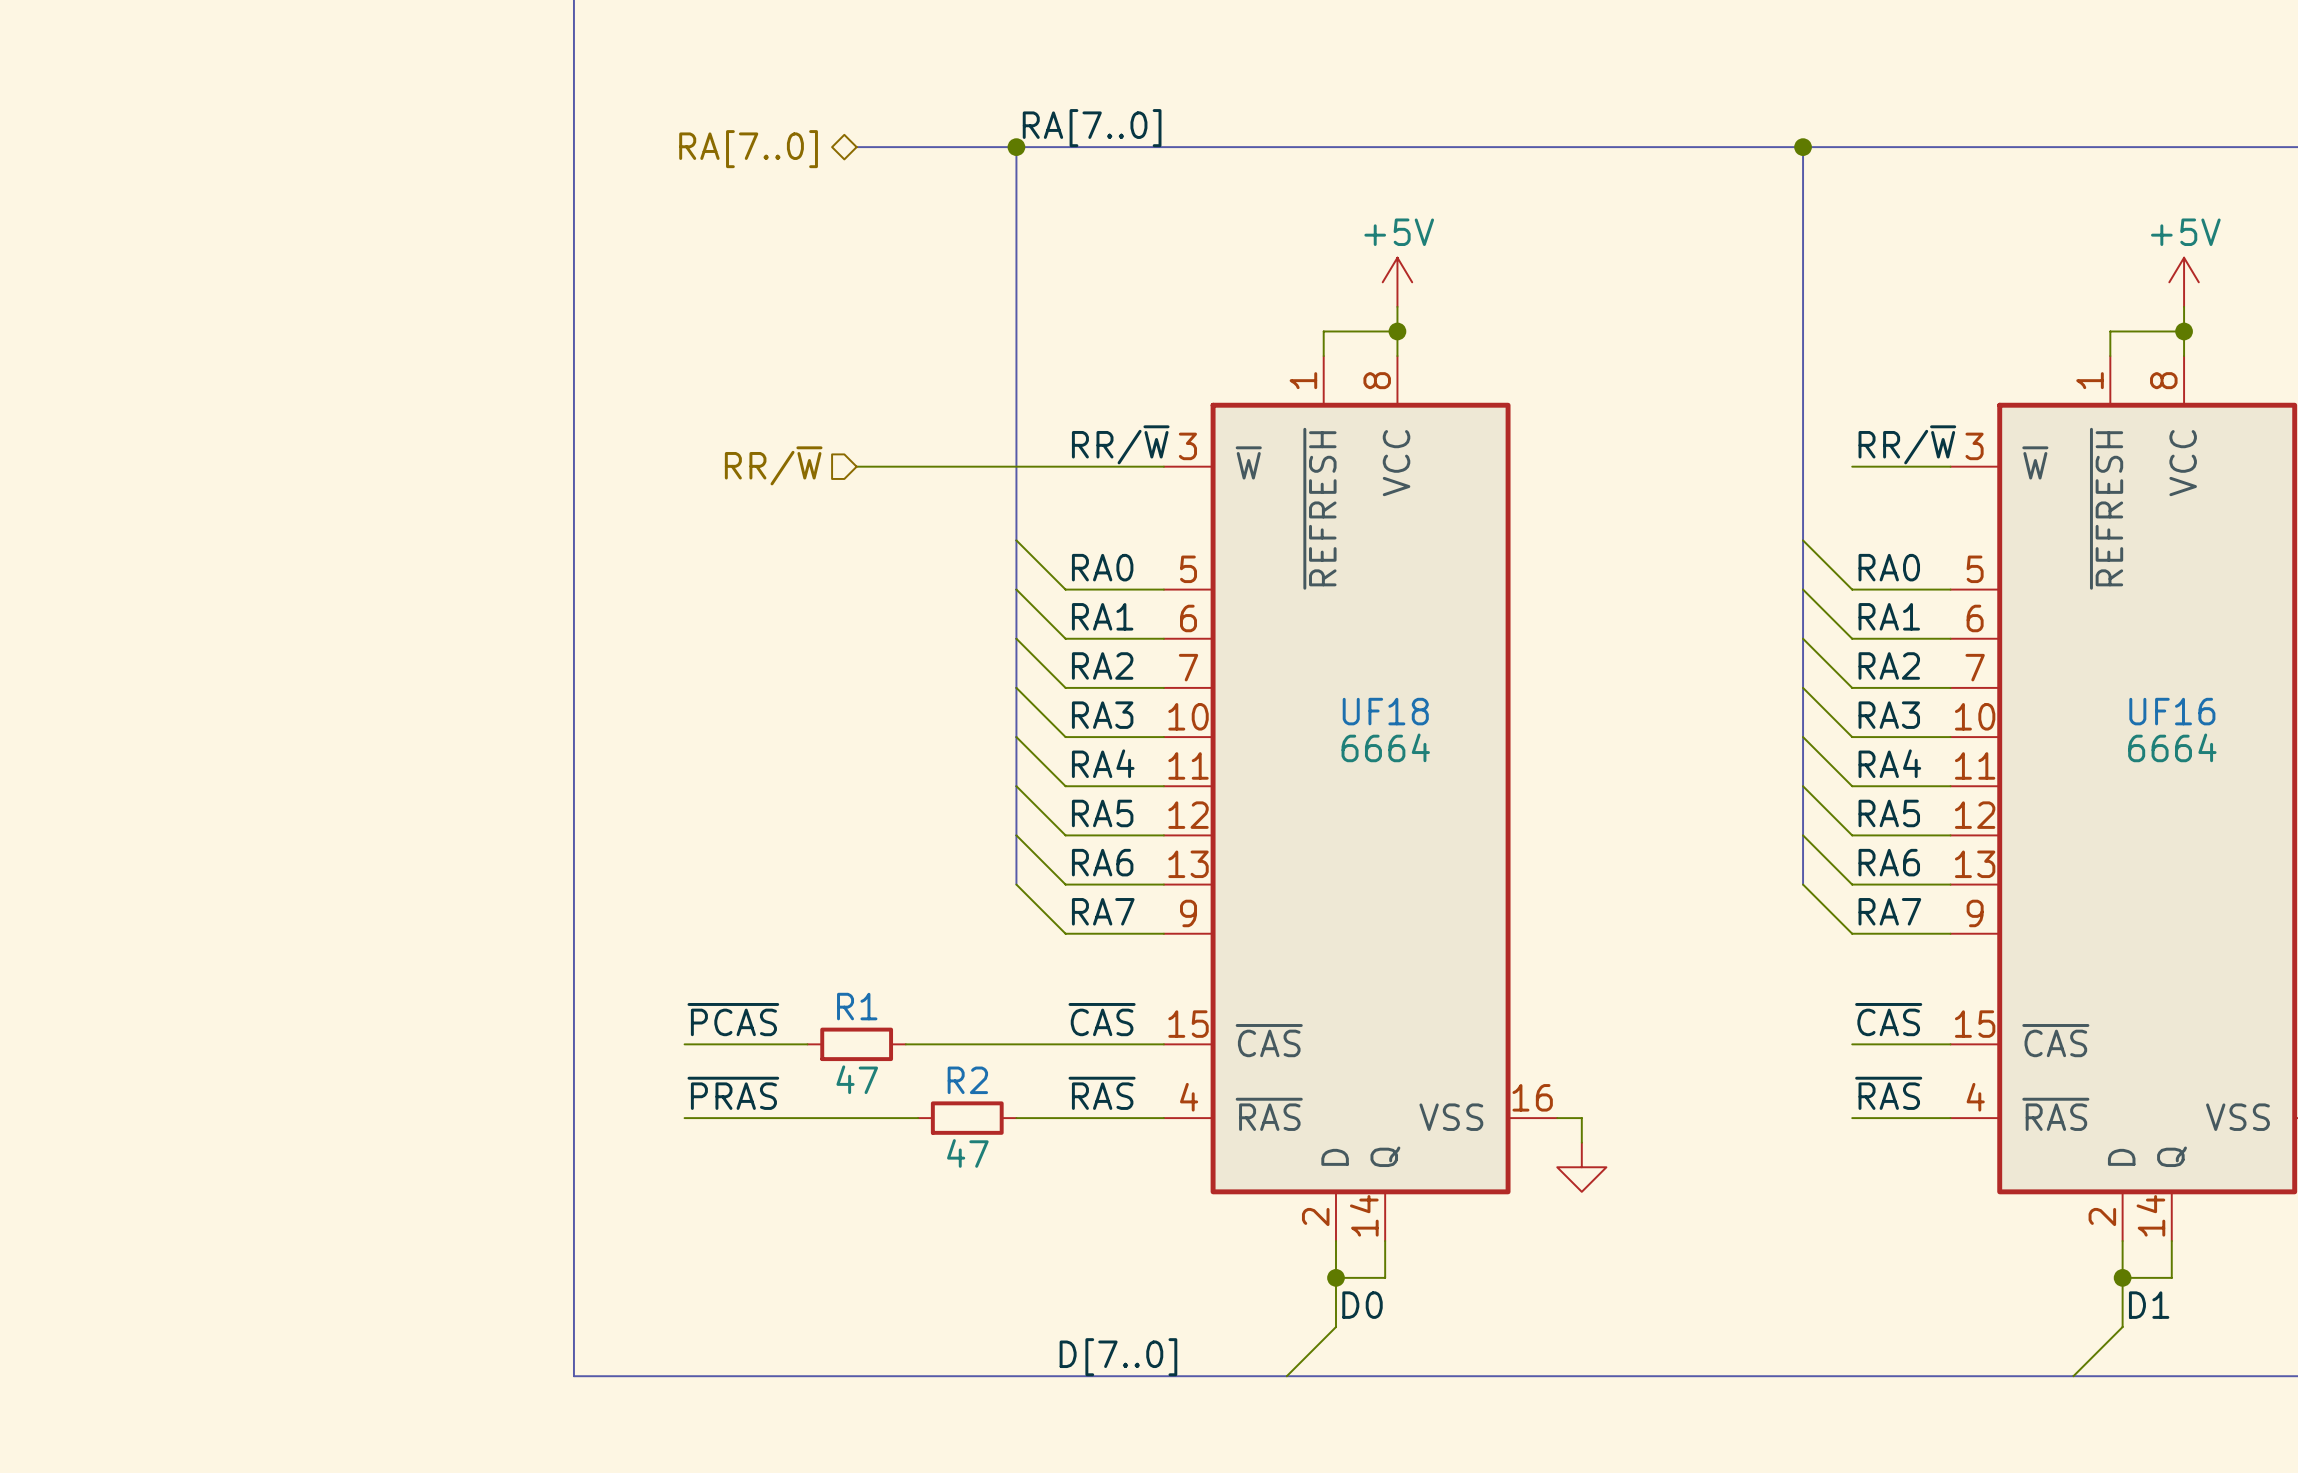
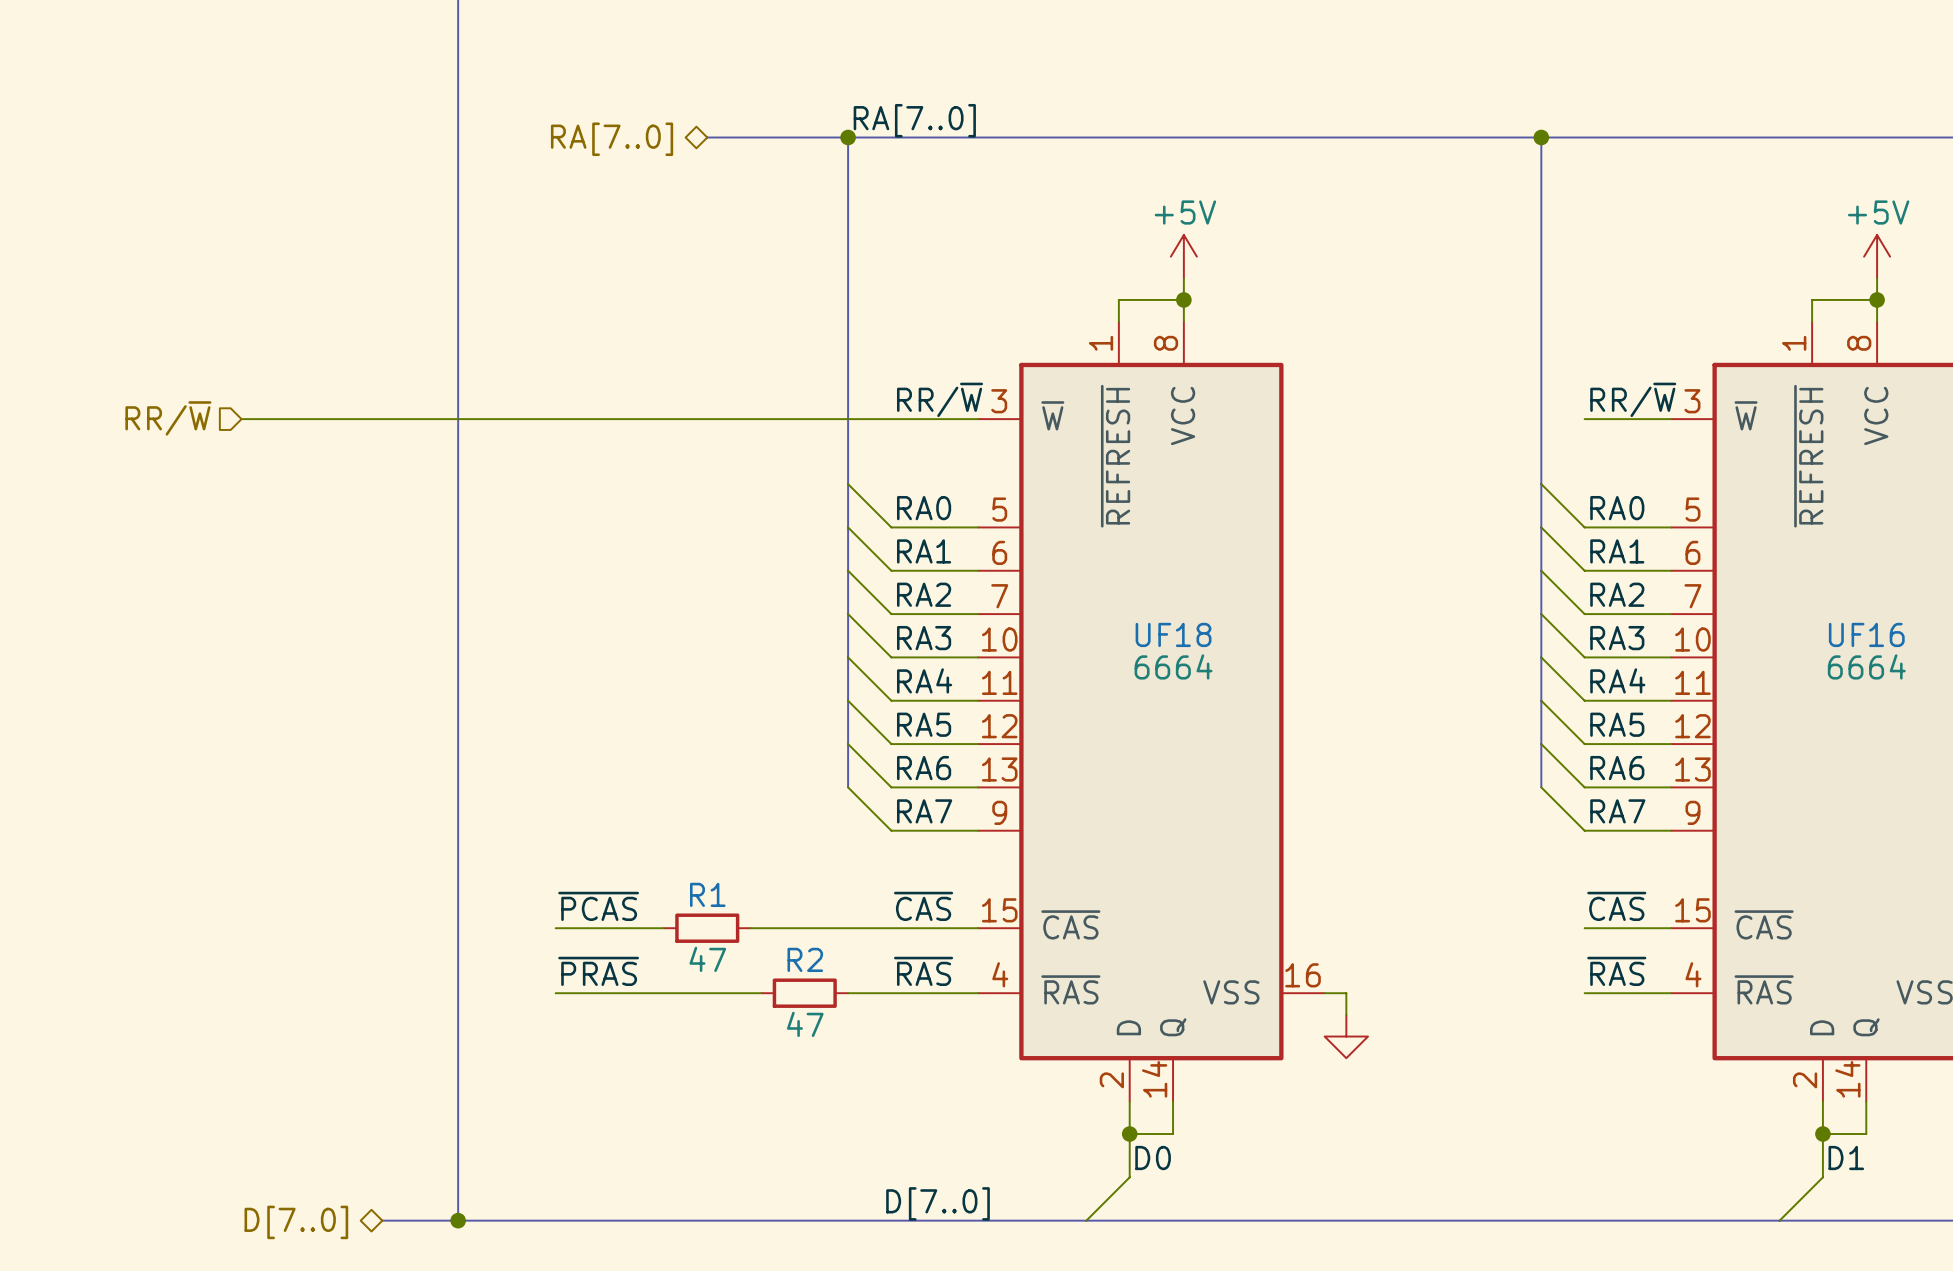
hierarchical label: none -> RR/~{W} (168, 418)
hierarchical label: RR/~{W} (773, 465) -> none
wire: none -> (241, 419) (707, 419)
bus: none -> (382, 1220) (458, 1220)
junction: none -> (458, 1220)
hierarchical label: none -> D[7..0] (296, 1222)

